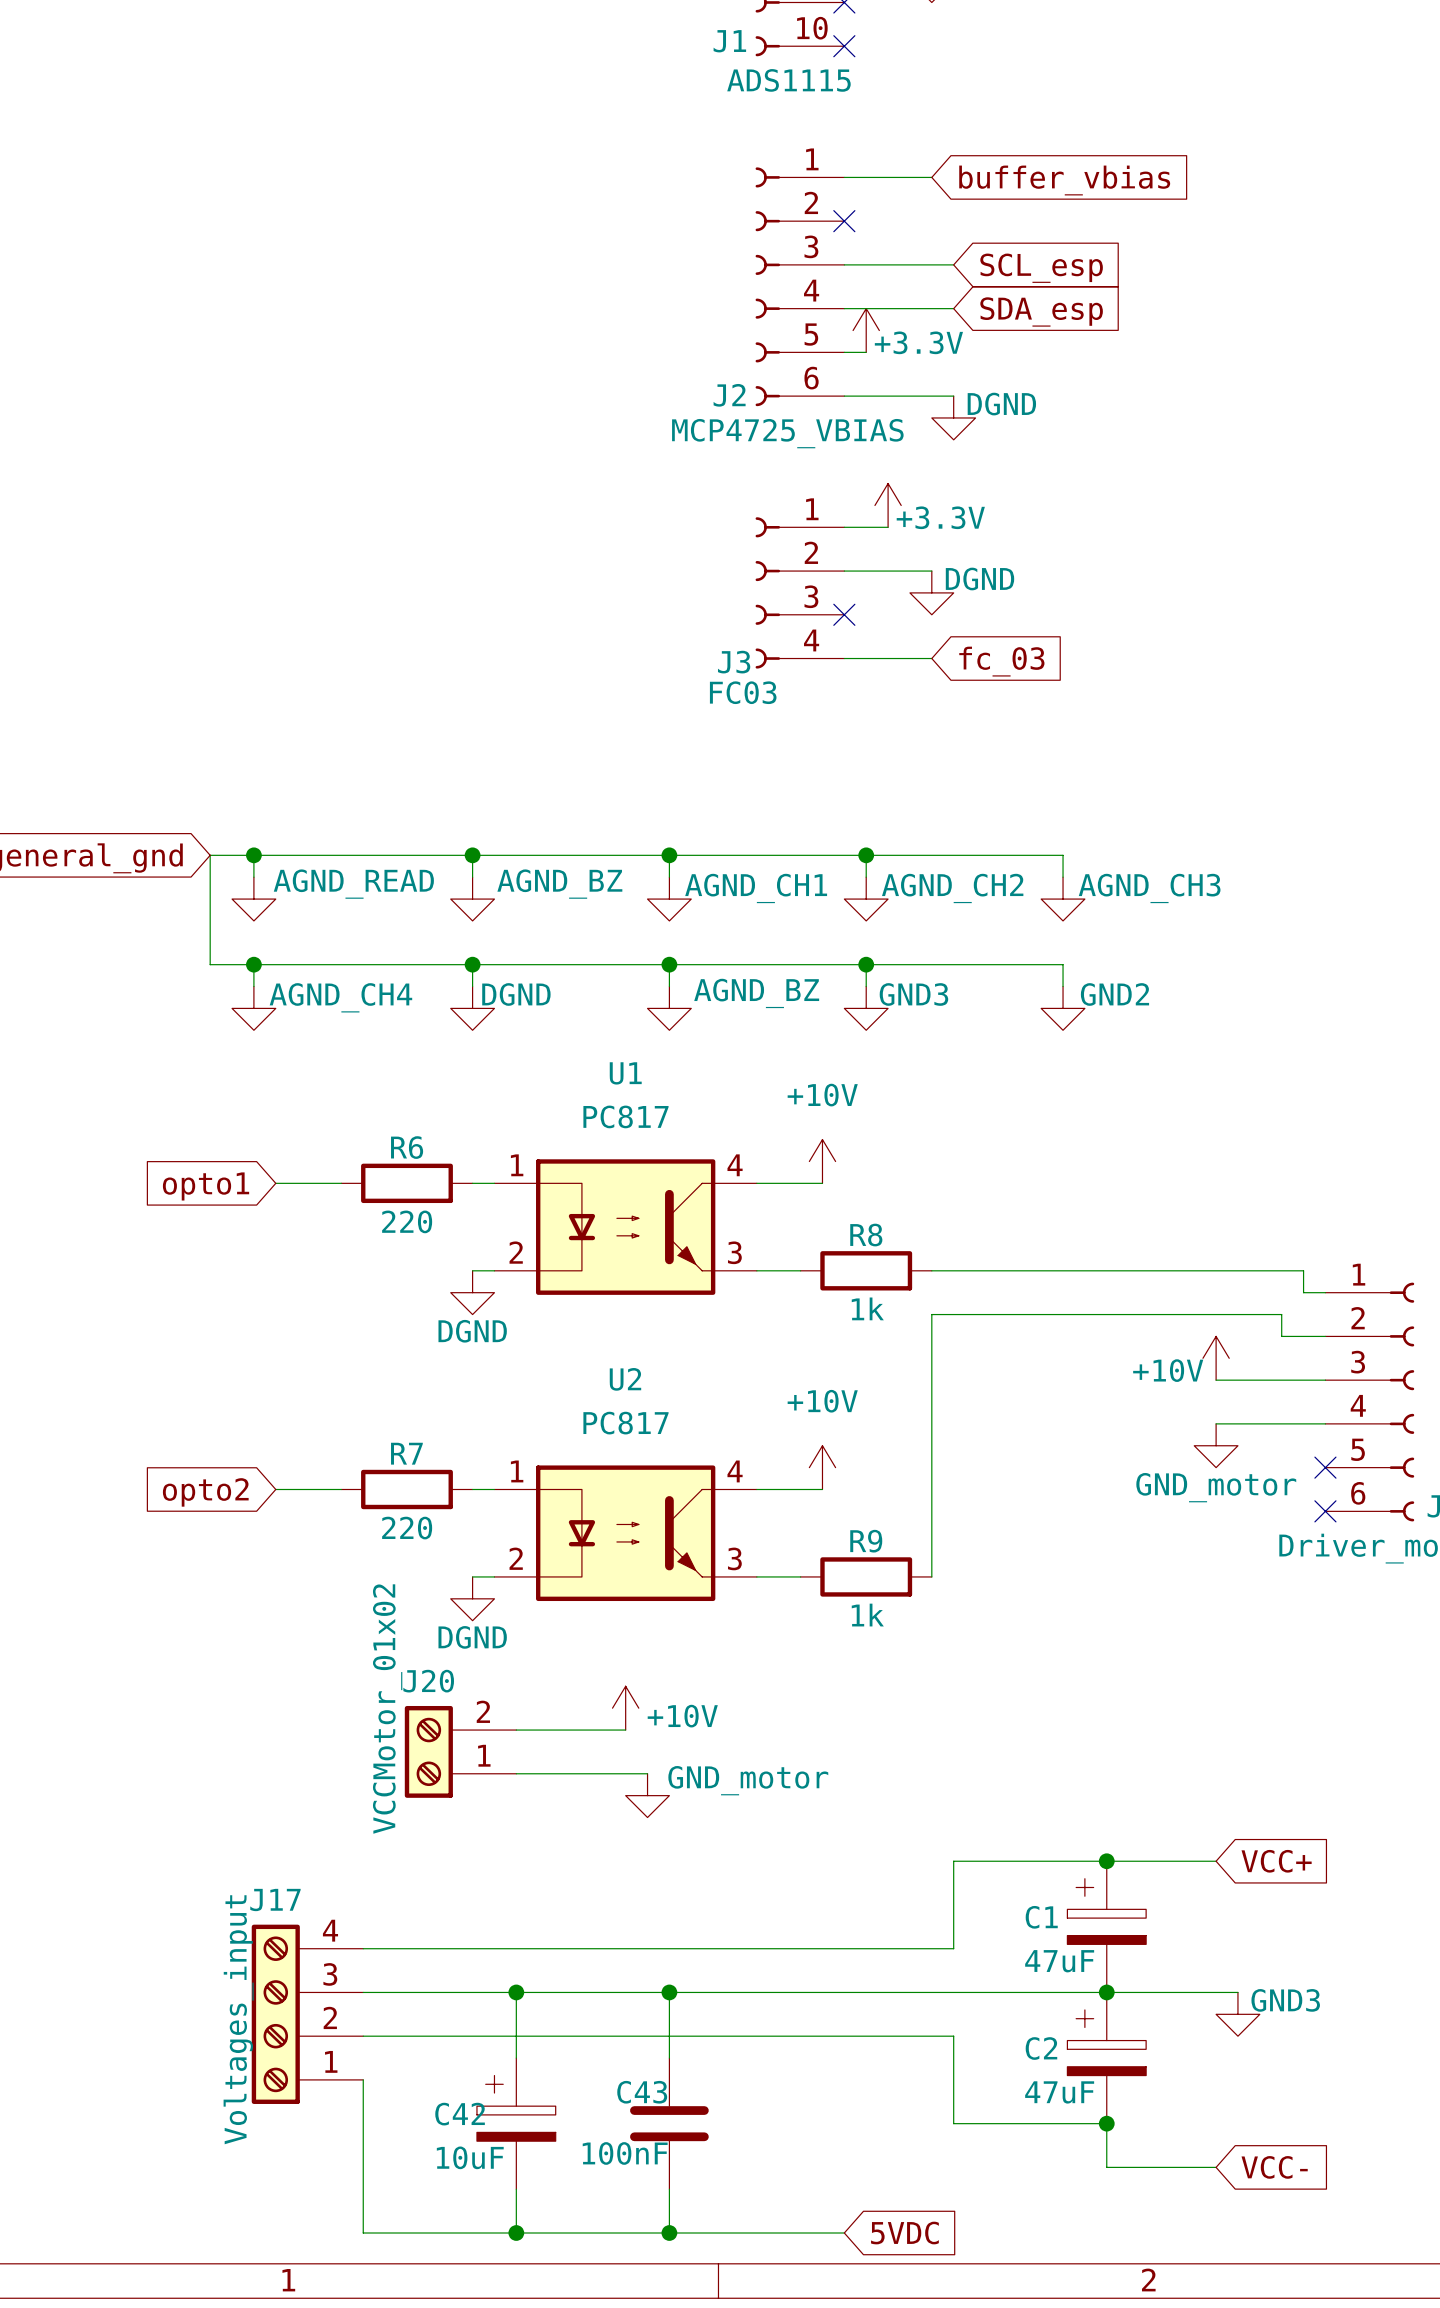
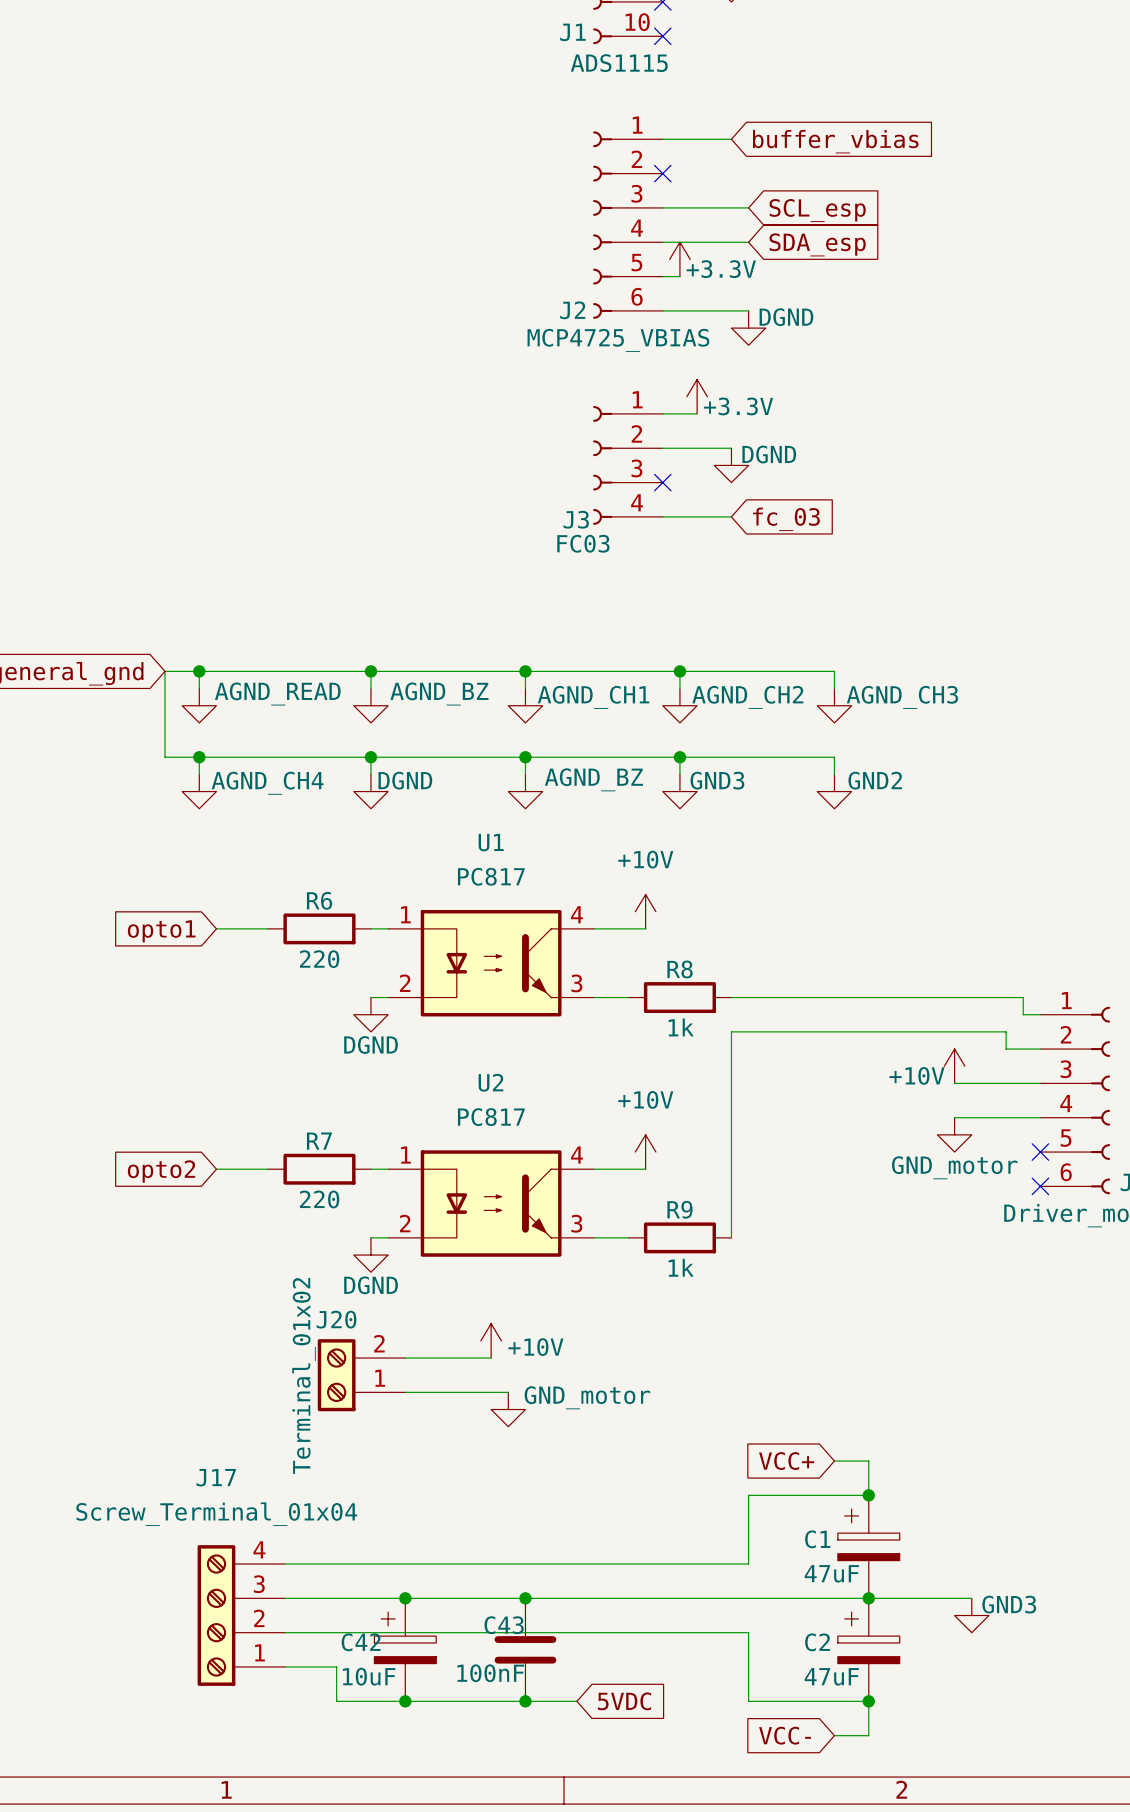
J20 value: VCCMotor_01x02 (387, 1709) -> Terminal_01x02 (304, 1375)
wire: (1063, 1861) (953, 1861) (953, 1904) -> (868, 1461) (868, 1495) (748, 1495)
wire: (1106, 1861) (1216, 1861) -> none
junction: (1106, 1861) -> none
global label rotation: 0° (1276, 1861) -> 180° (786, 1461)
global label position: VCC+ (1276, 1861) -> VCC+ (786, 1461)
J17 name position: J17 (275, 1900) -> J17 (216, 1477)
junction: none -> (868, 1495)
C1 position: (1106, 1926) -> (868, 1546)
wire: (363, 1948) (953, 1948) -> none
wire: (516, 1992) (516, 2058) -> none
junction position: (516, 1992) -> (405, 1598)
wire: (669, 1992) (669, 2058) -> none
junction position: (669, 1992) -> (525, 1598)
wire: (953, 1992) (1237, 1992) -> (748, 1564) (748, 1529)
junction: (1106, 1992) -> none
J17 position: (307, 2014) -> (241, 1615)
power symbol position: GND3 (1237, 2014) -> GND3 (971, 1615)
J17 value: Voltages_input (238, 2019) -> Screw_Terminal_01x04 (216, 1514)
wire: (953, 2036) (953, 2079) -> (748, 1598) (971, 1598)
junction: none -> (868, 1598)
C2 position: (1106, 2058) -> (868, 1649)
wire: (363, 2079) (363, 2232) (844, 2232) -> (285, 1632) (748, 1632)
wire: none -> (285, 1667) (336, 1667) (336, 1701) (576, 1701)
C42 position: (516, 2123) -> (405, 1649)
C43 position: (669, 2123) -> (525, 1649)
wire: (953, 2123) (1106, 2123) (1106, 2167) (1216, 2167) -> (748, 1667) (748, 1701) (868, 1701) (868, 1735) (834, 1735)
junction: (1106, 2123) -> none
junction: none -> (868, 1701)
global label rotation: 0° (1274, 2167) -> 180° (785, 1735)
global label position: VCC- (1274, 2167) -> VCC- (785, 1735)
wire: (516, 2189) (516, 2232) -> none
wire: (669, 2189) (669, 2232) -> none
junction position: (516, 2232) -> (405, 1701)
junction position: (669, 2232) -> (525, 1701)
global label position: 5VDC (904, 2233) -> 5VDC (624, 1701)

